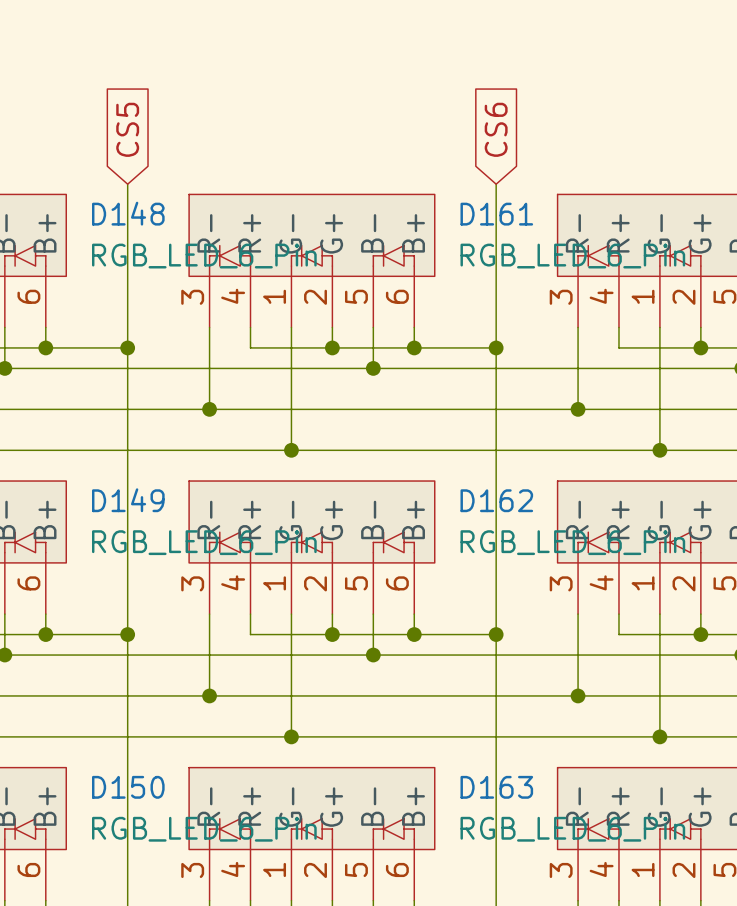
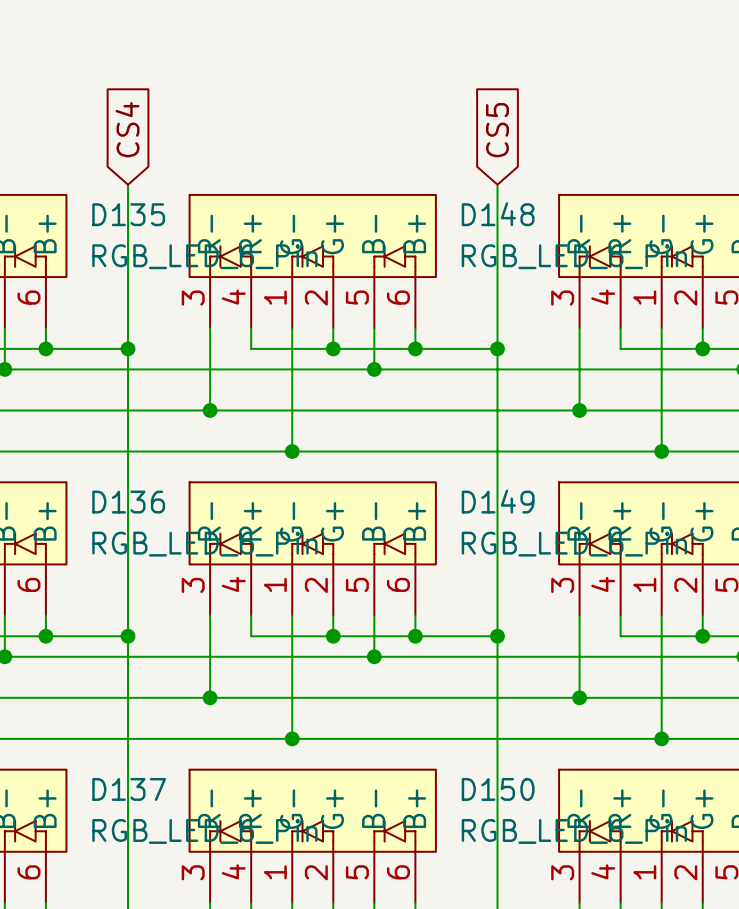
global label: CS5 (127, 129) -> CS4 (127, 129)
global label: CS6 (496, 129) -> CS5 (497, 130)
D148 name: D148 (128, 213) -> D135 (128, 214)
D161 name: D161 (496, 214) -> D148 (498, 214)
D149 name: D149 (128, 500) -> D136 (128, 502)
D162 name: D162 (496, 500) -> D149 (498, 501)
D150 name: D150 (128, 787) -> D137 (129, 789)
D163 name: D163 (496, 787) -> D150 (498, 789)

